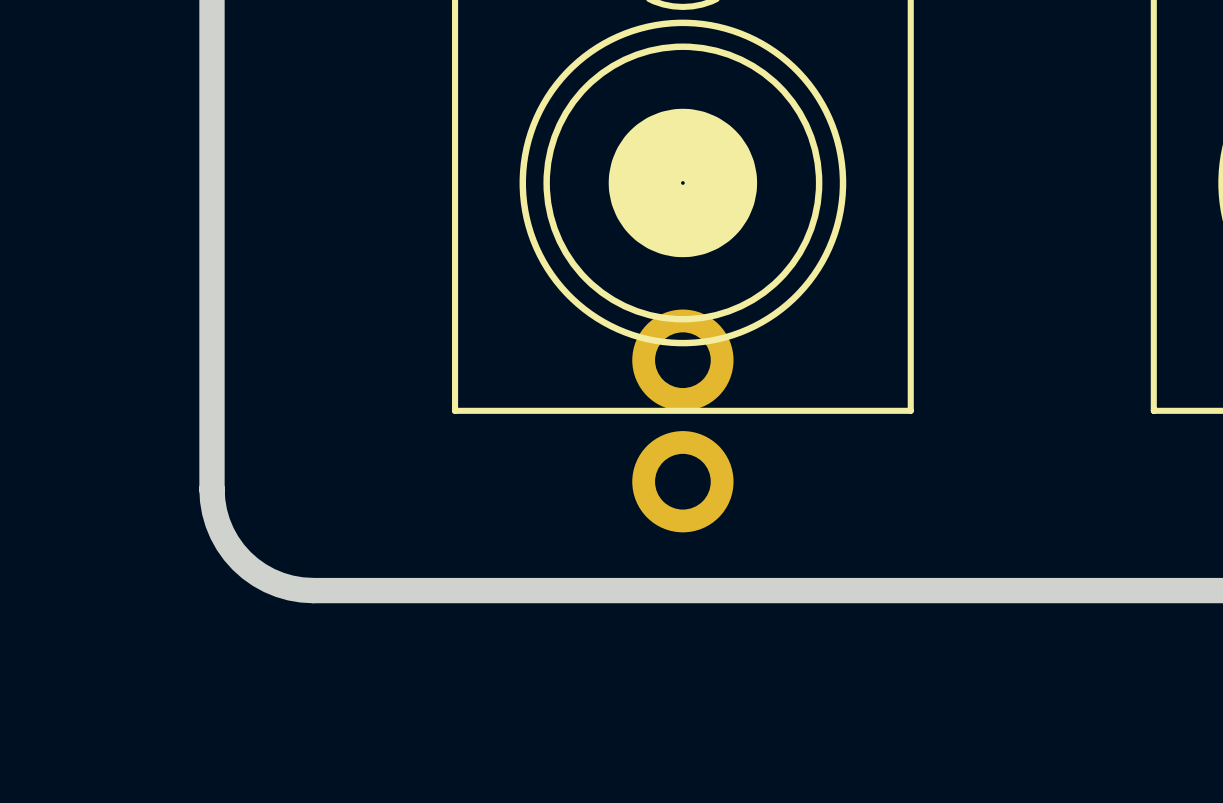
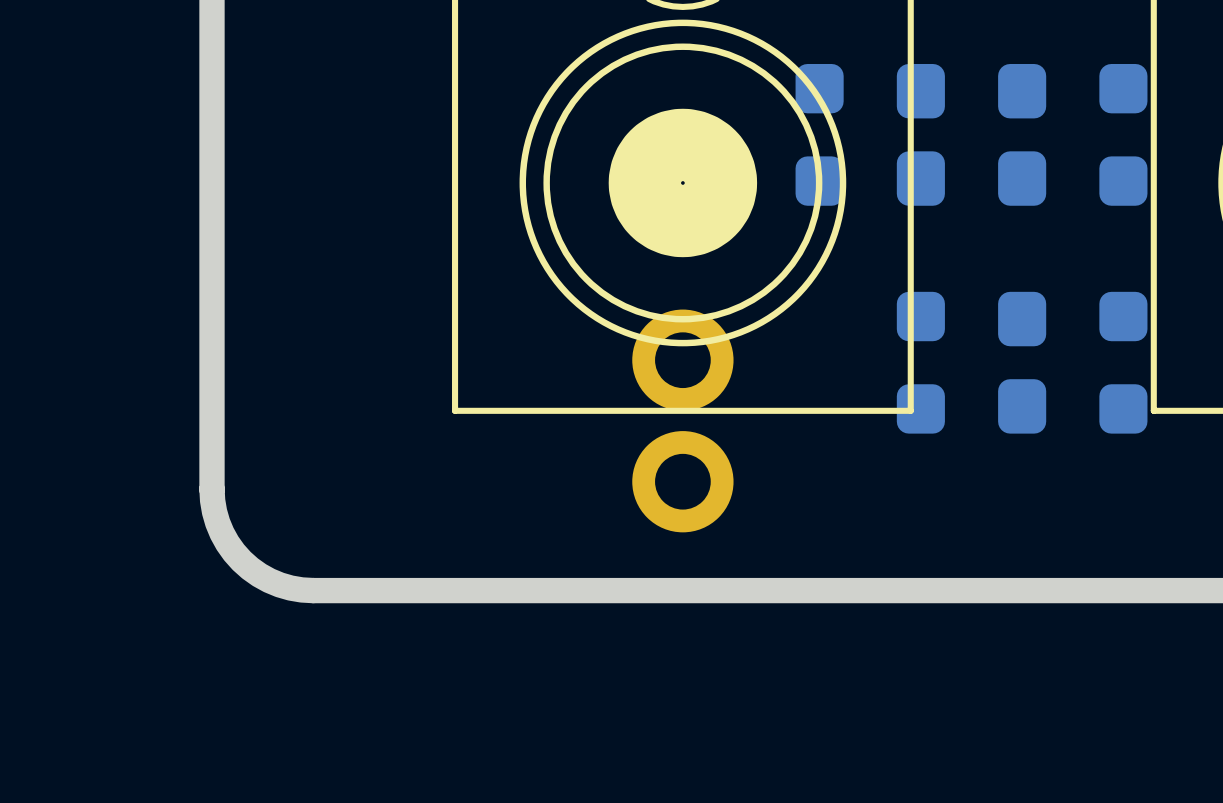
part: none -> (819, 134)
part: none -> (920, 134)
part: none -> (1022, 134)
part: none -> (1123, 134)
part: none -> (920, 362)
part: none -> (1022, 362)
part: none -> (1123, 362)

